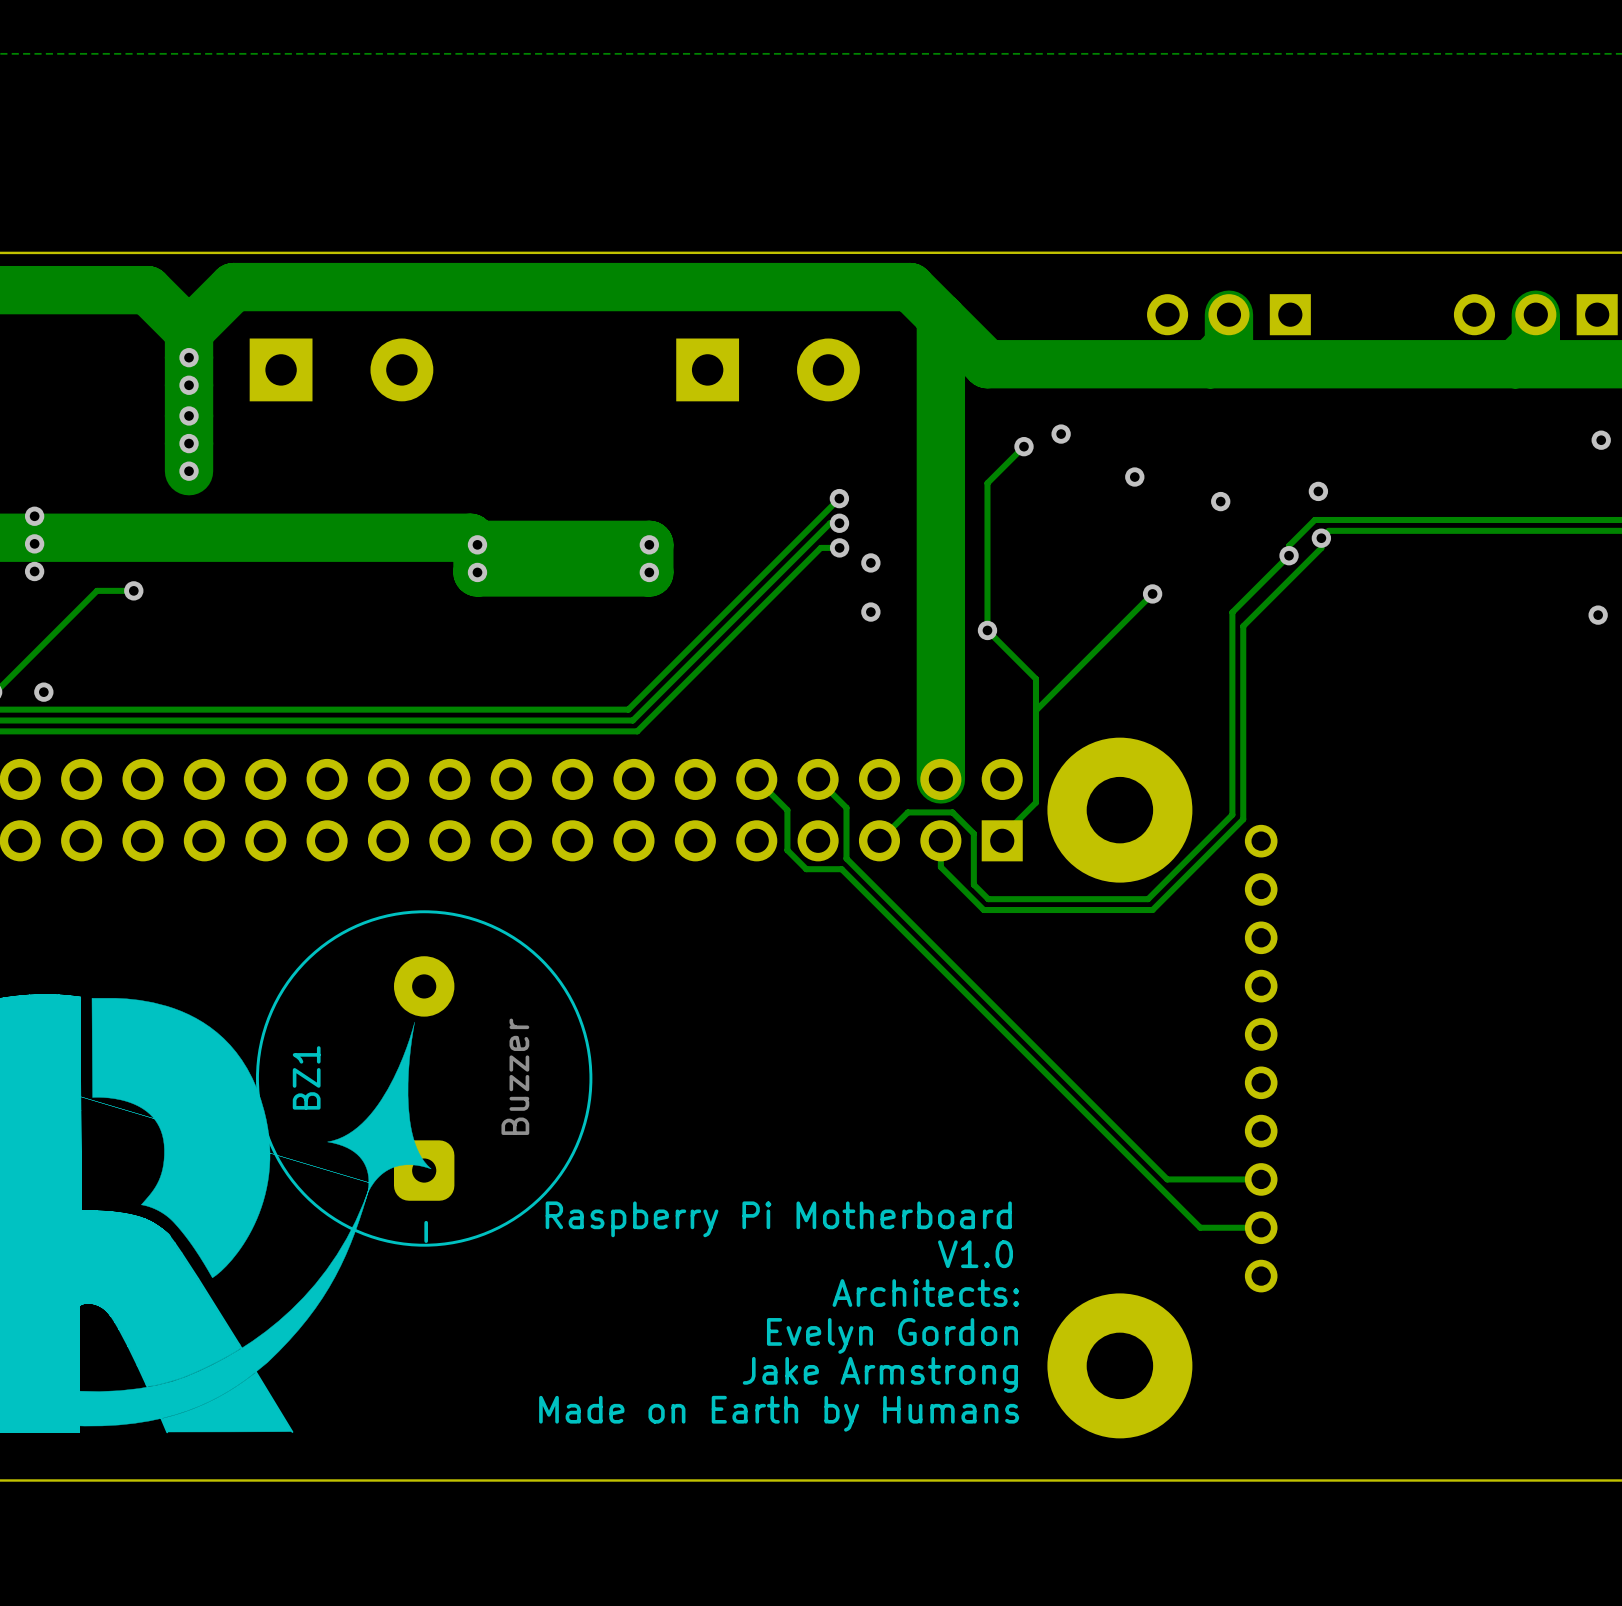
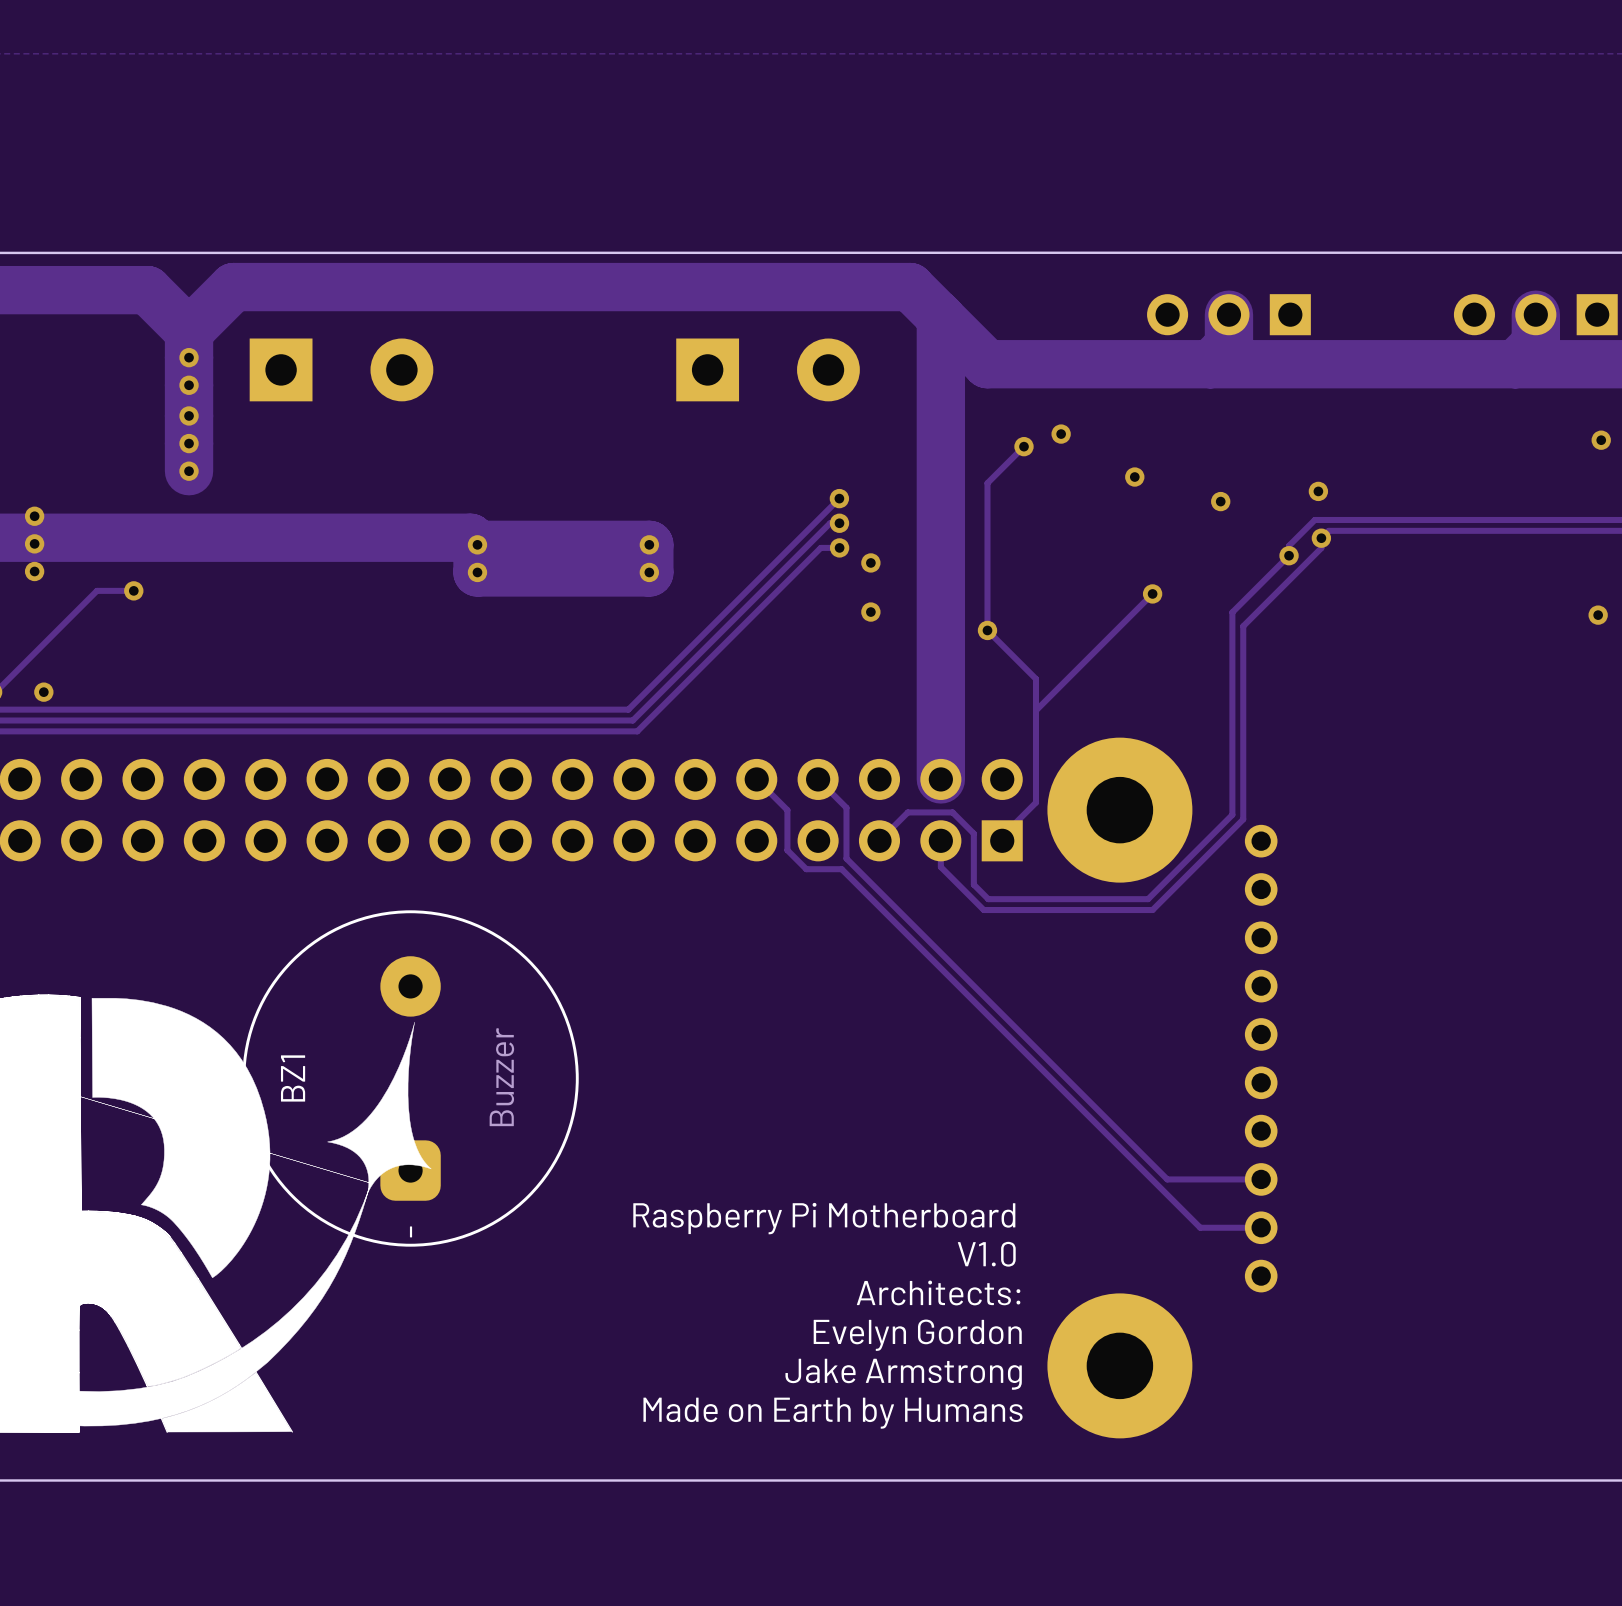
BZ1 position: (424, 1078) -> (410, 1078)

